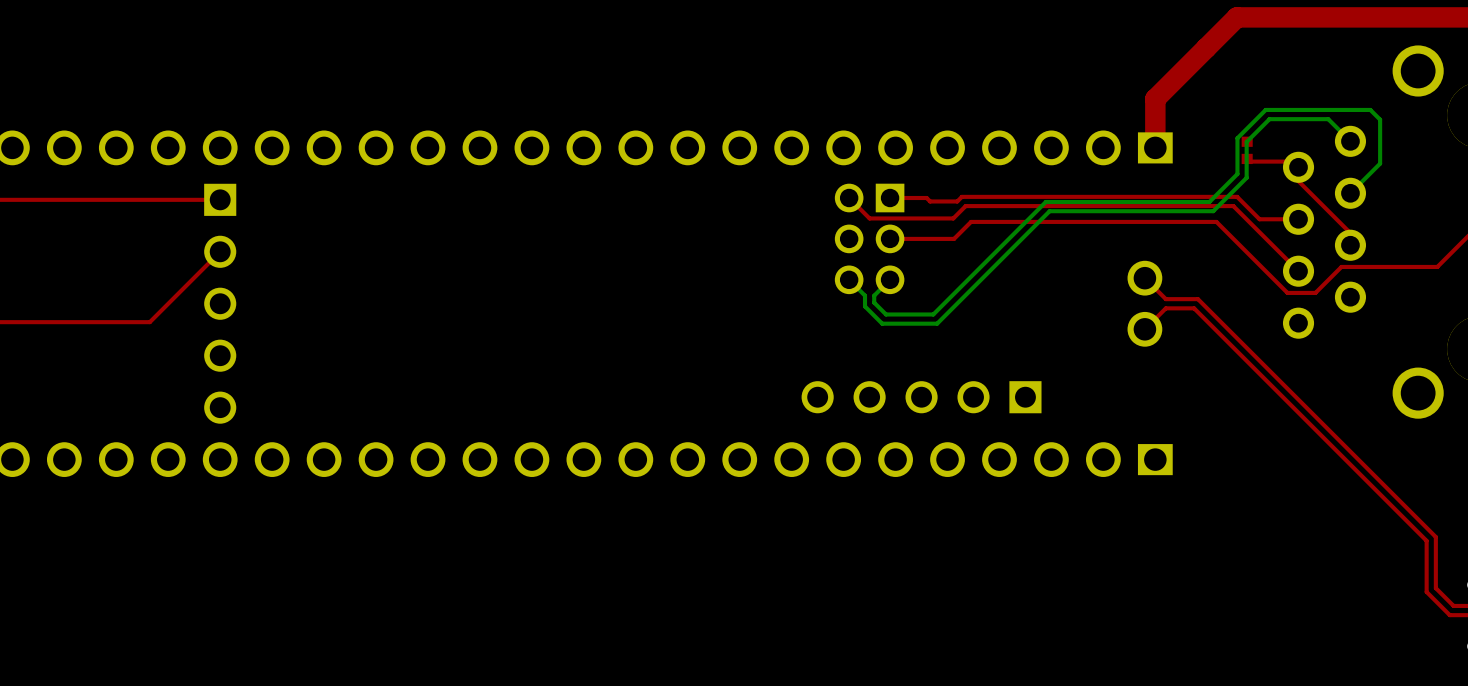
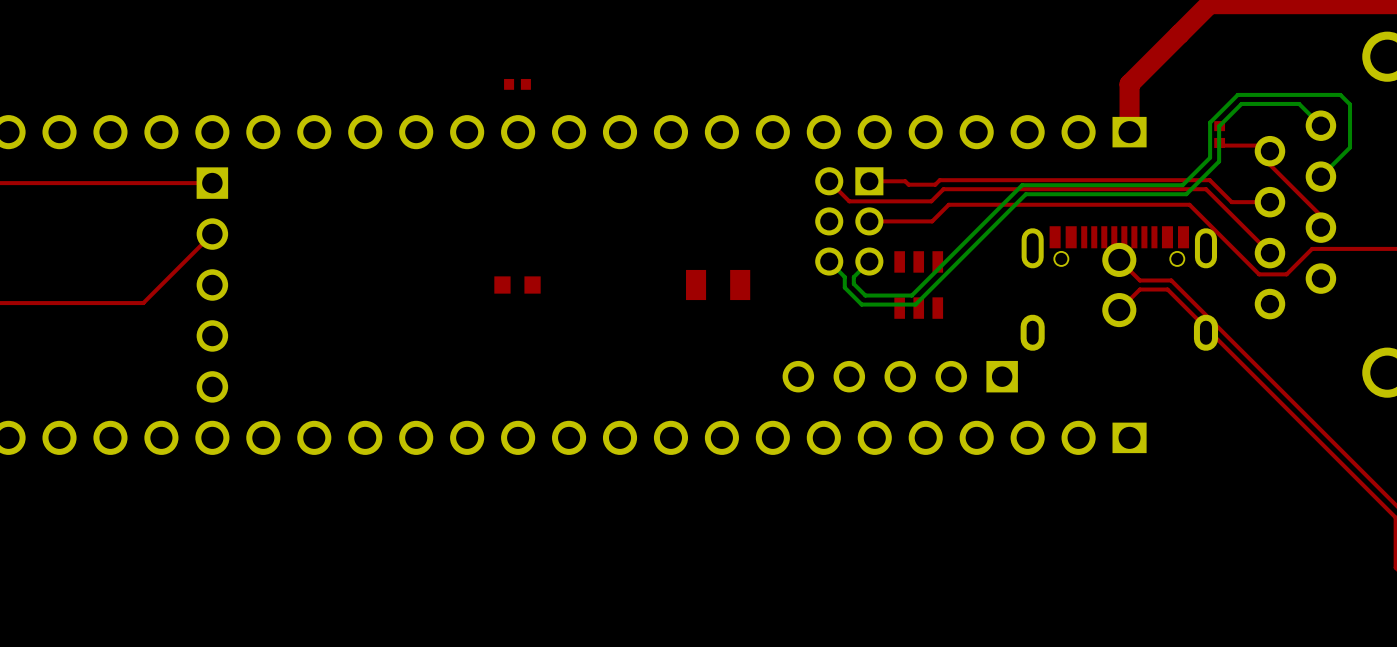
part: none -> (517, 84)
part: none -> (517, 285)
part: none -> (718, 285)
part: none -> (918, 285)
part: none -> (1119, 288)

